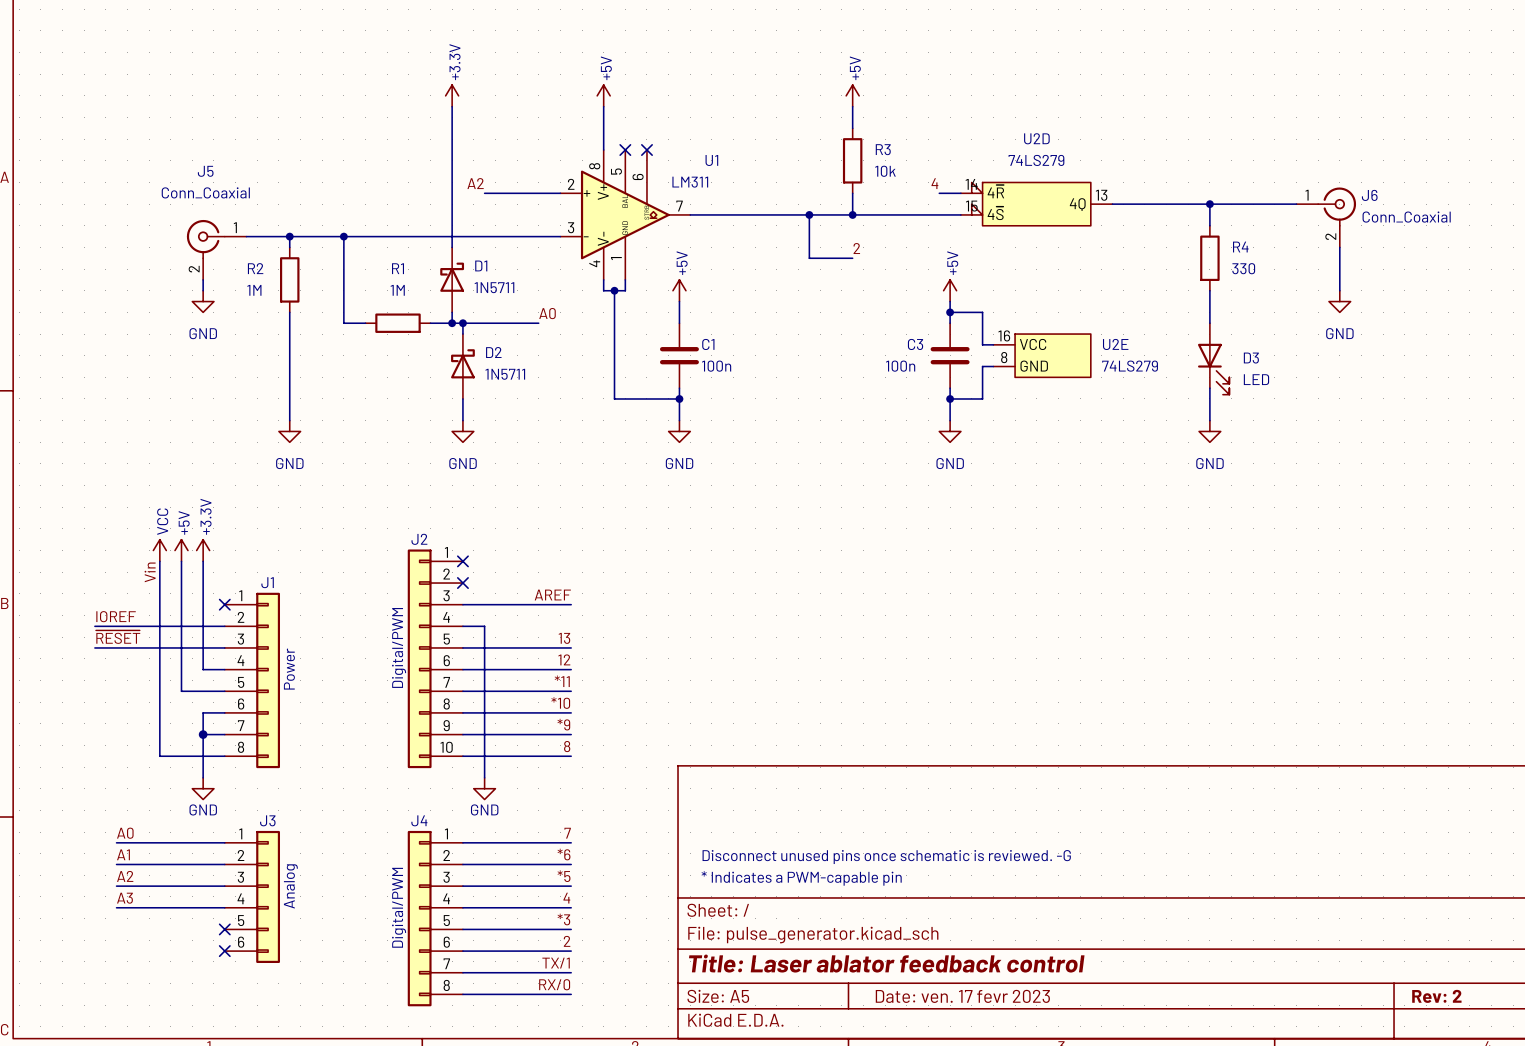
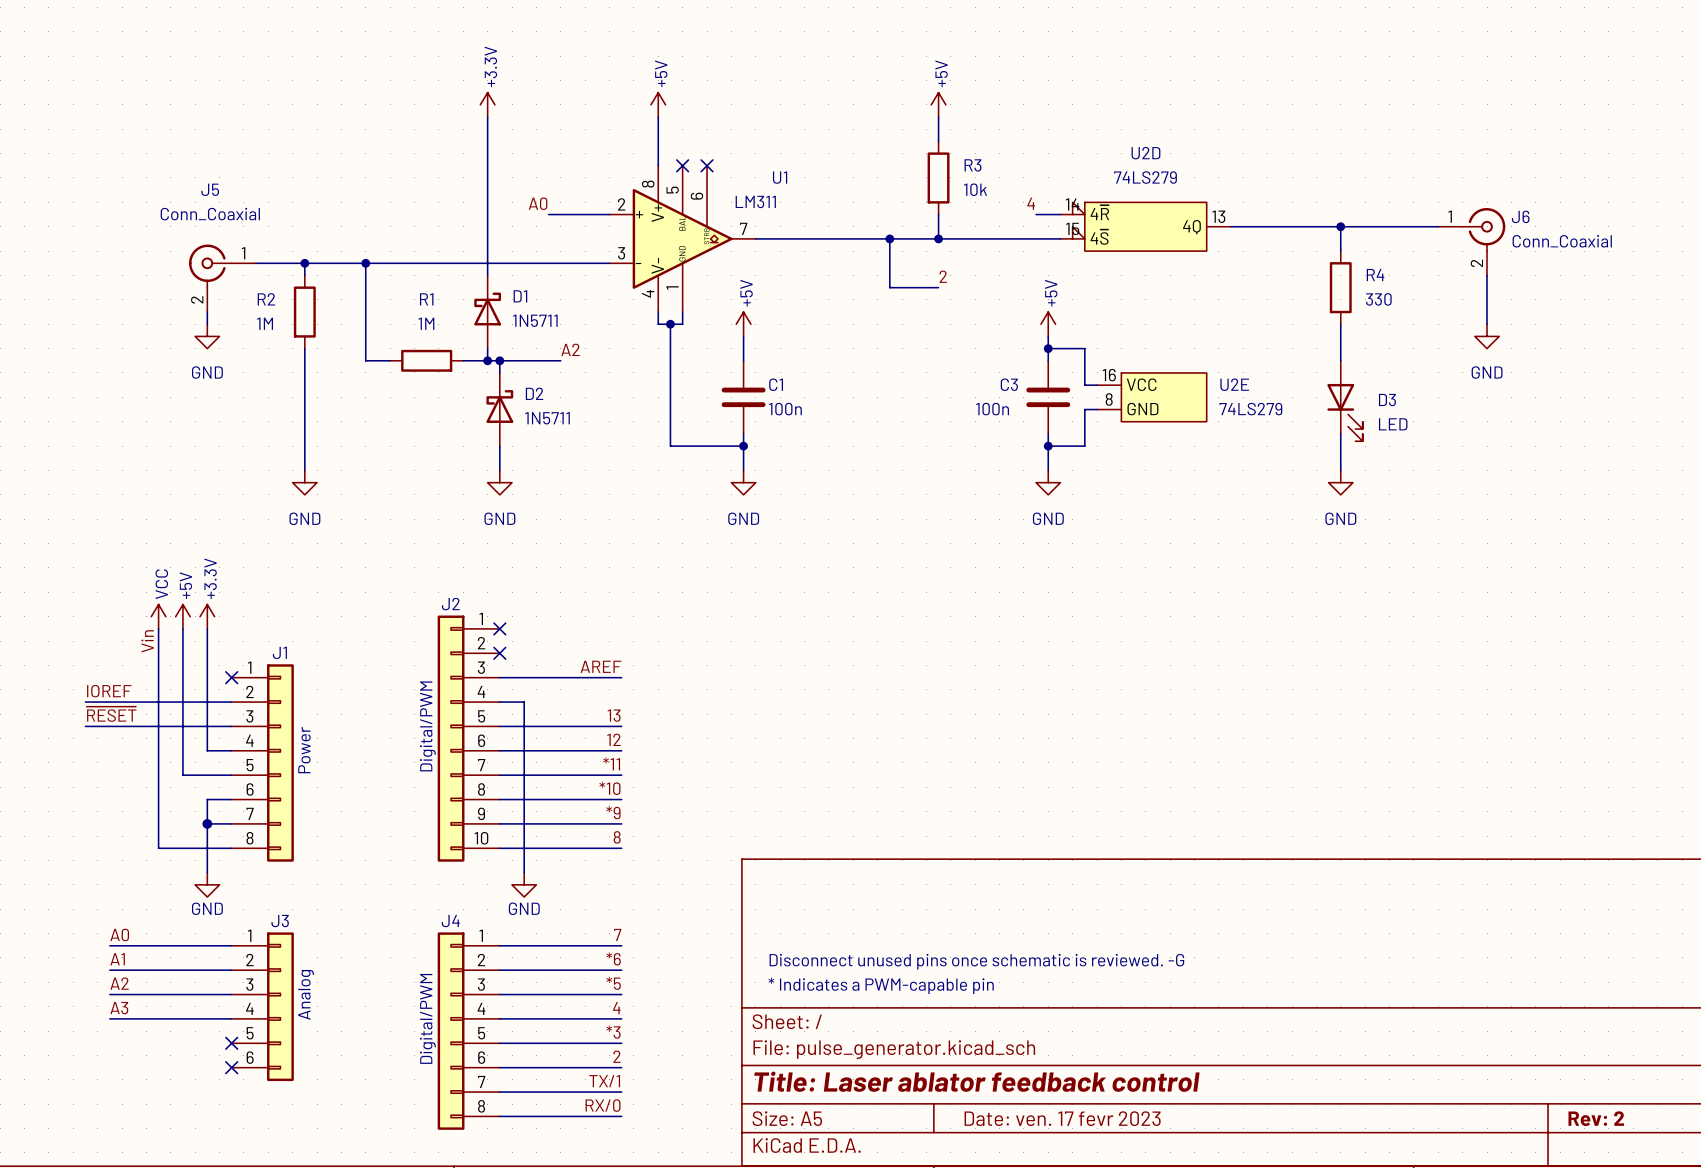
label position: A2 (475, 183) -> A2 (570, 349)
wire: (484, 193) (506, 193) -> none
label position: A0 (547, 313) -> A0 (538, 203)
wire: (517, 323) (538, 323) -> none

